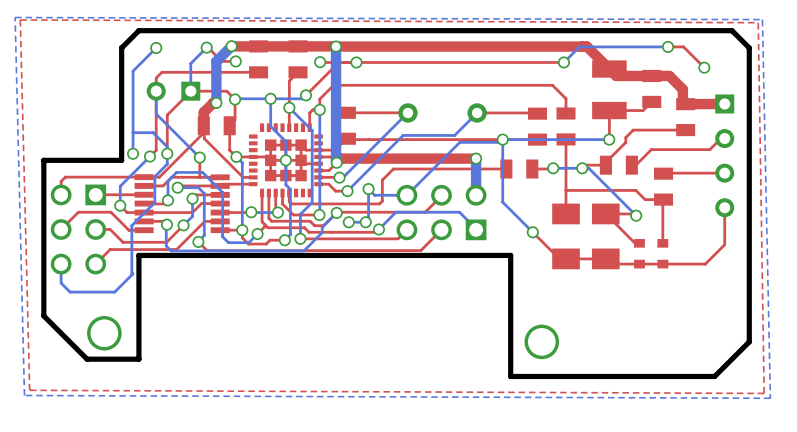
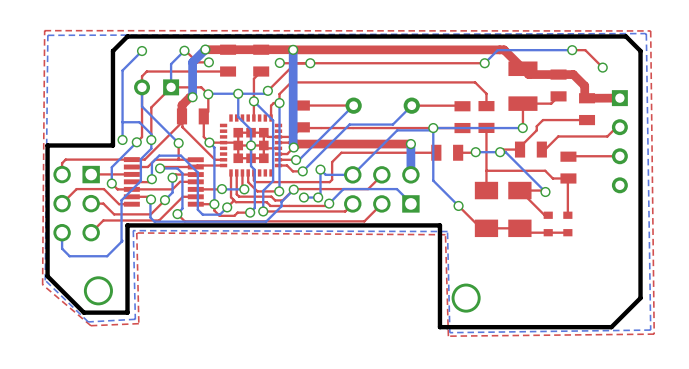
bottom zone outline: (15, 17) (24, 395) (770, 398) (762, 19) (15, 17) -> (645, 33) (650, 330) (449, 332) (447, 231) (133, 230) (135, 319) (88, 321) (45, 280) (47, 35) (645, 33)
top zone outline: (20, 19) (29, 390) (764, 393) (758, 22) (20, 19) -> (44, 30) (650, 30) (654, 334) (448, 336) (445, 234) (136, 232) (138, 323) (90, 325) (42, 284) (44, 30)
top track: (724, 207) (724, 244) (705, 264) (662, 264) -> none

